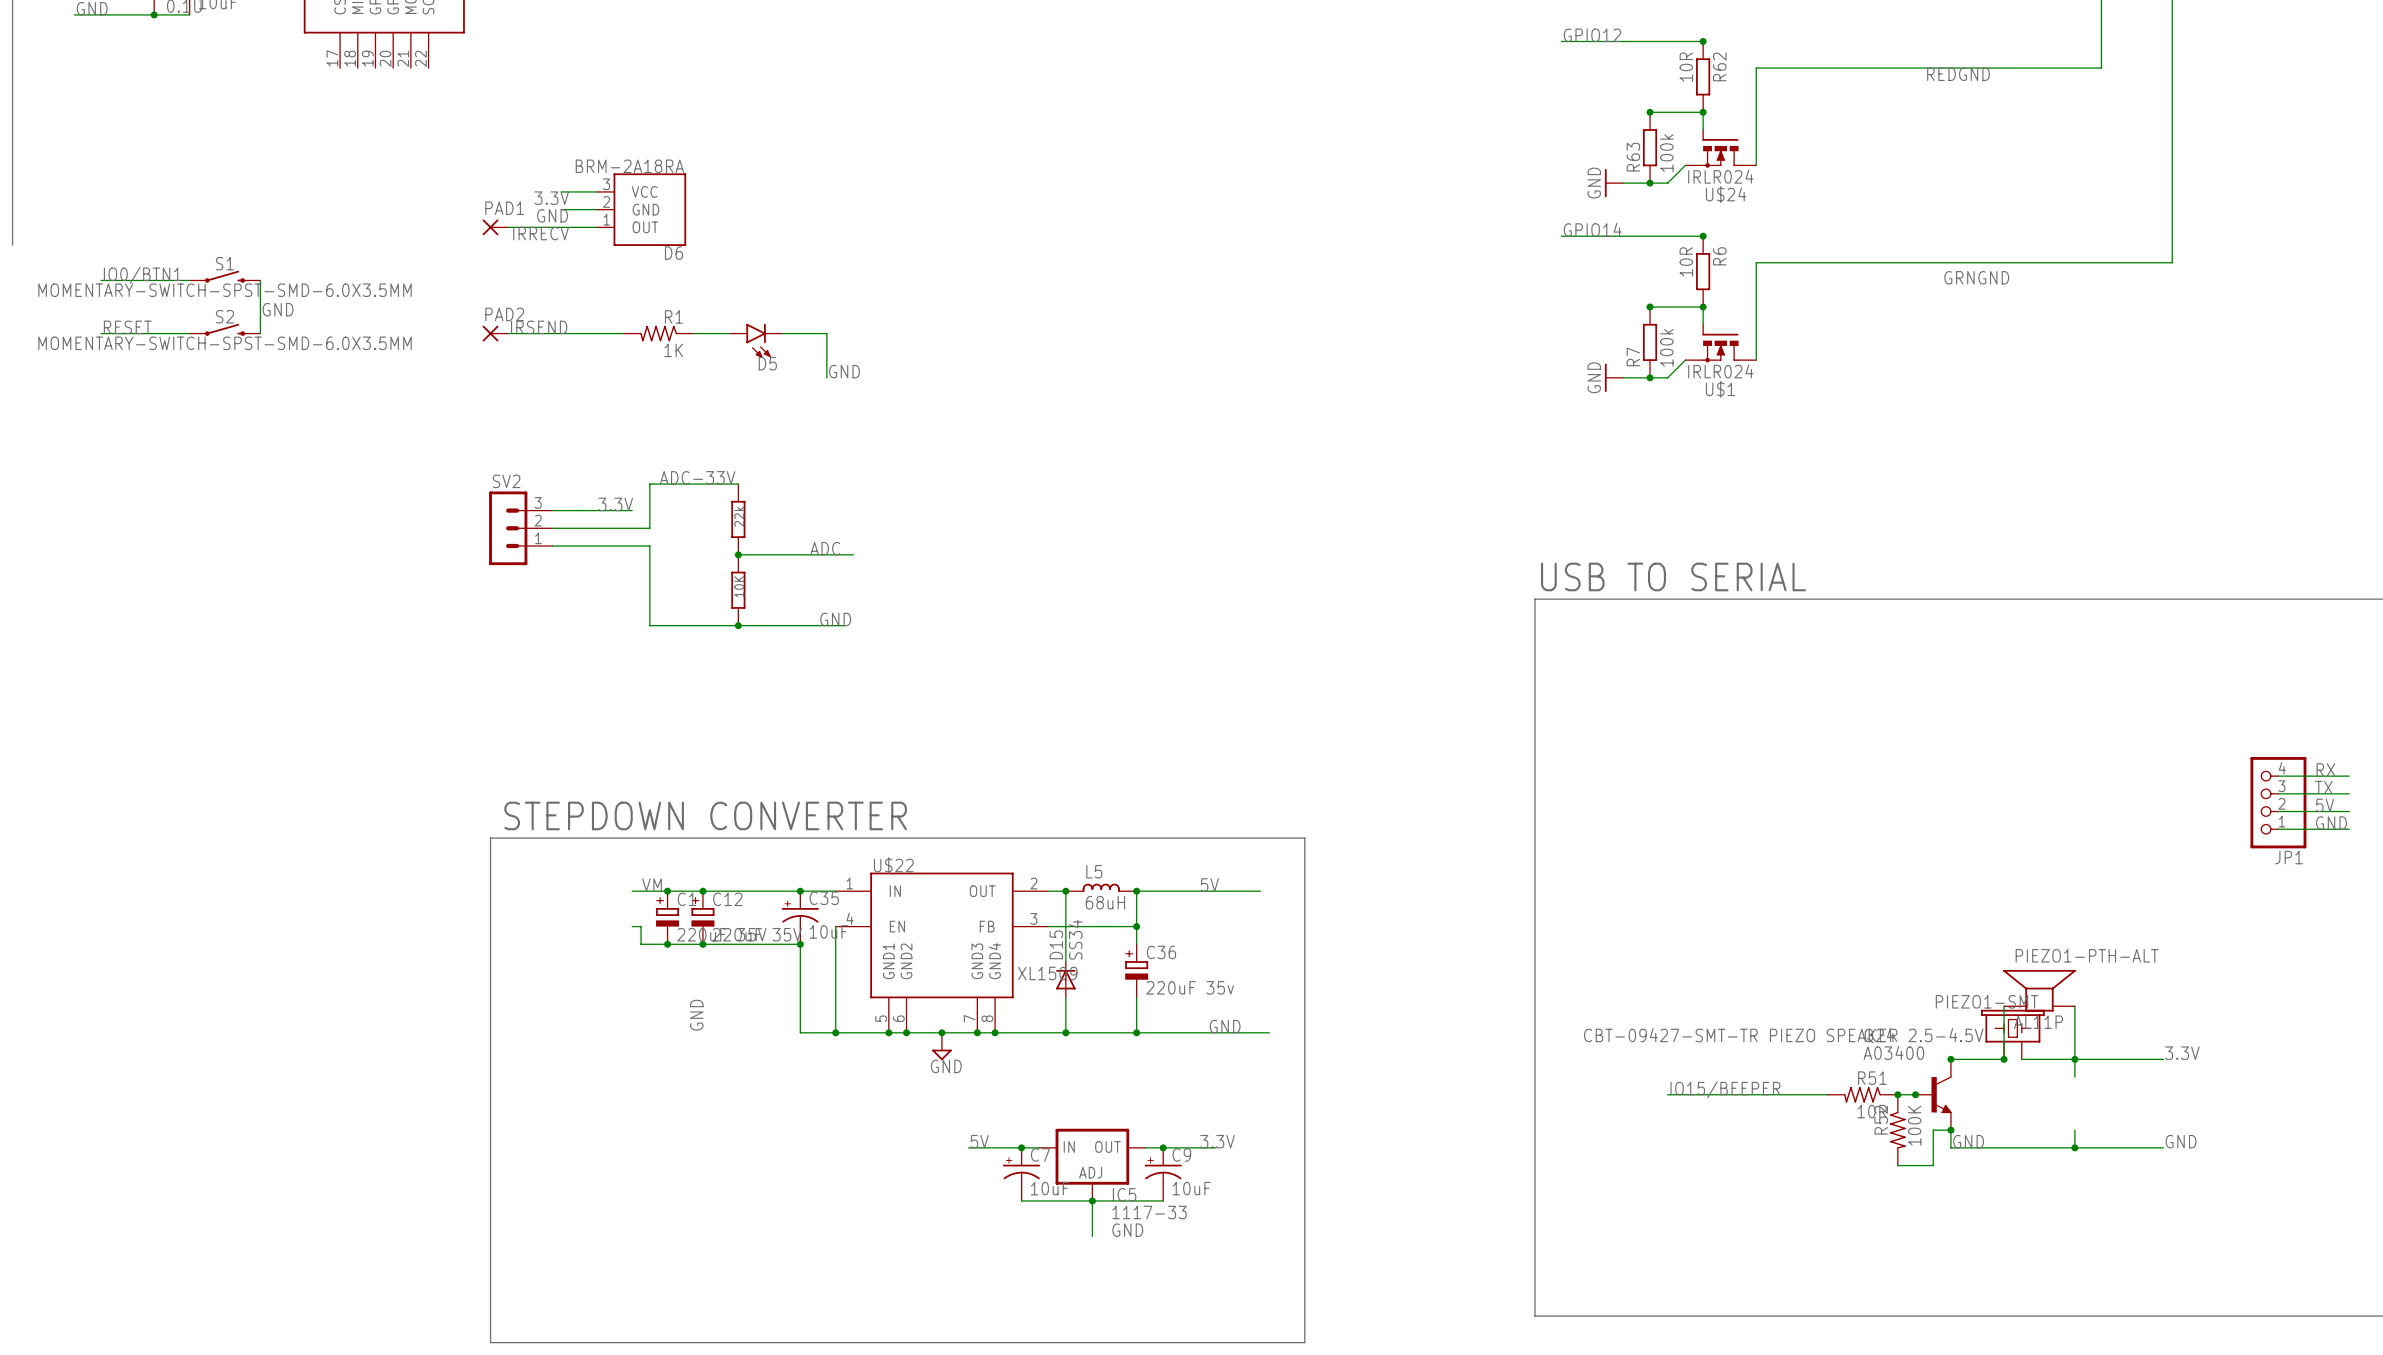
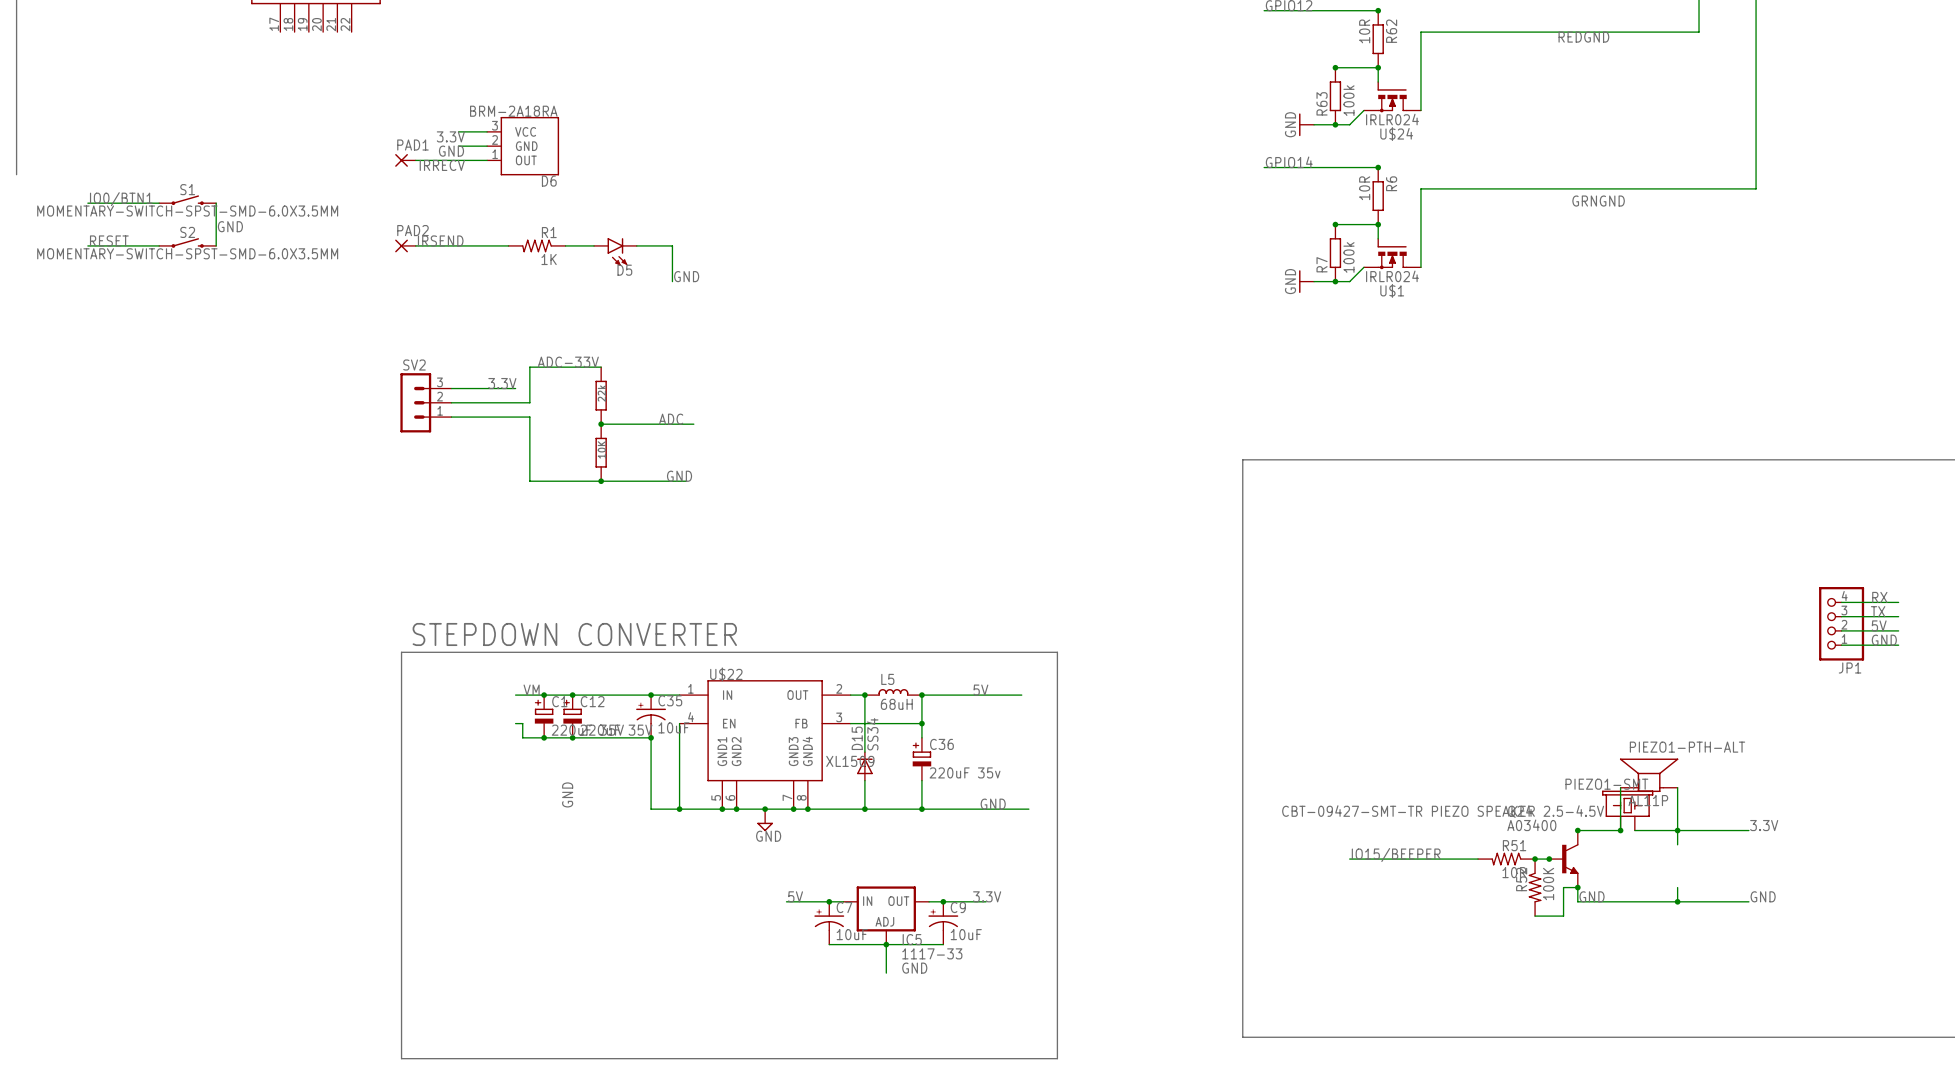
text: USB TO SERIAL (1673, 576) -> none

